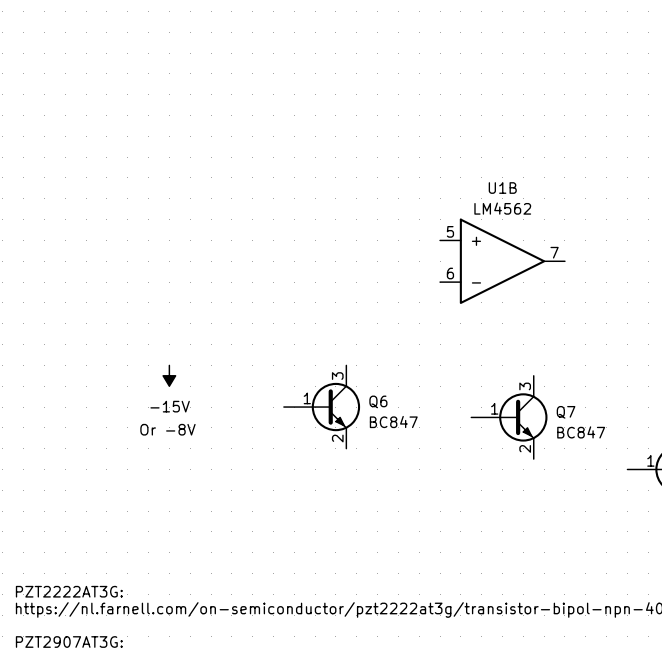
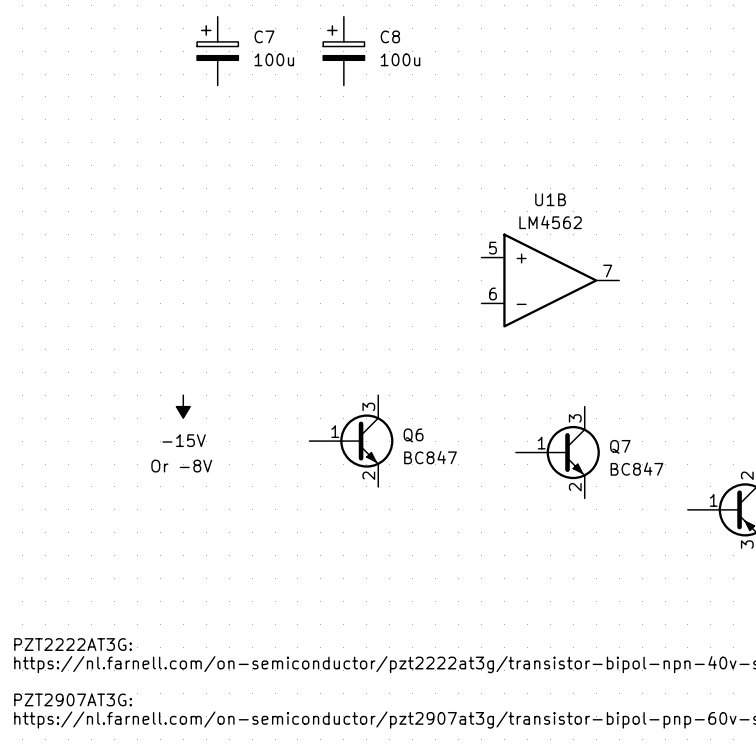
C7: none -> 100u (217, 51)
C8: none -> 100u (343, 51)

